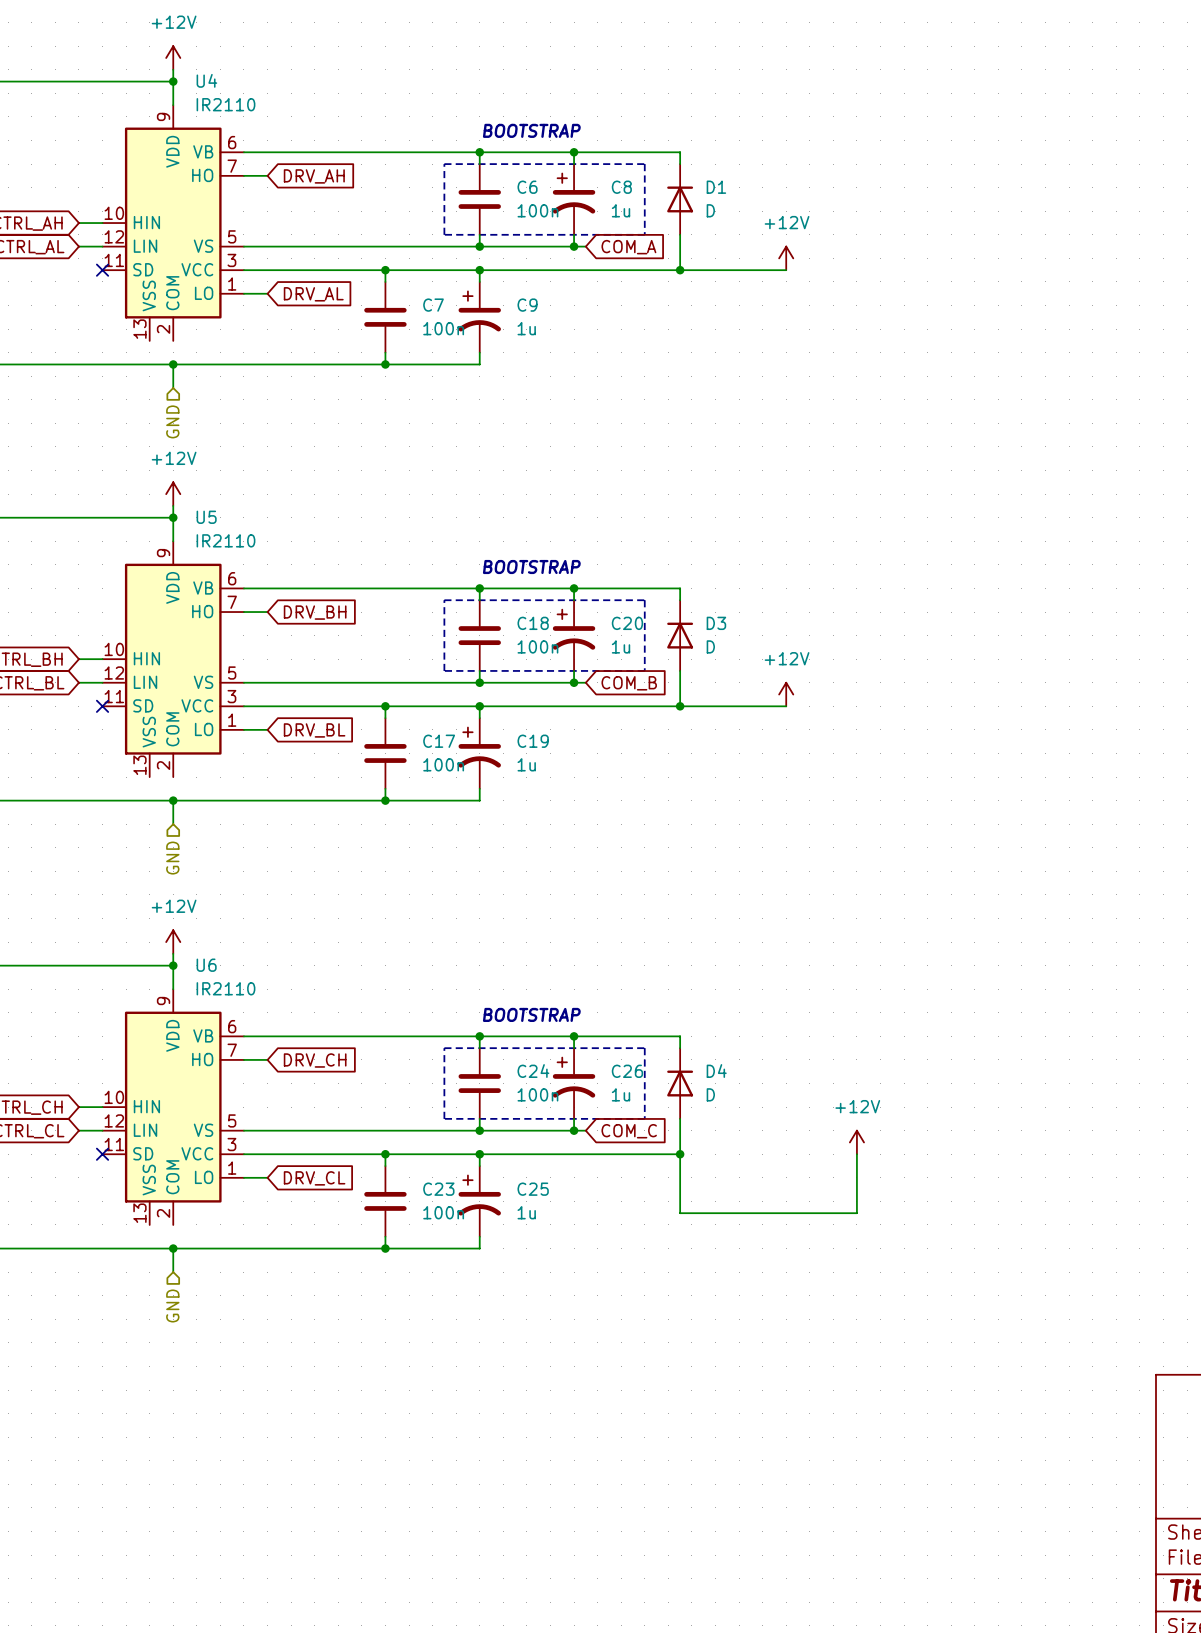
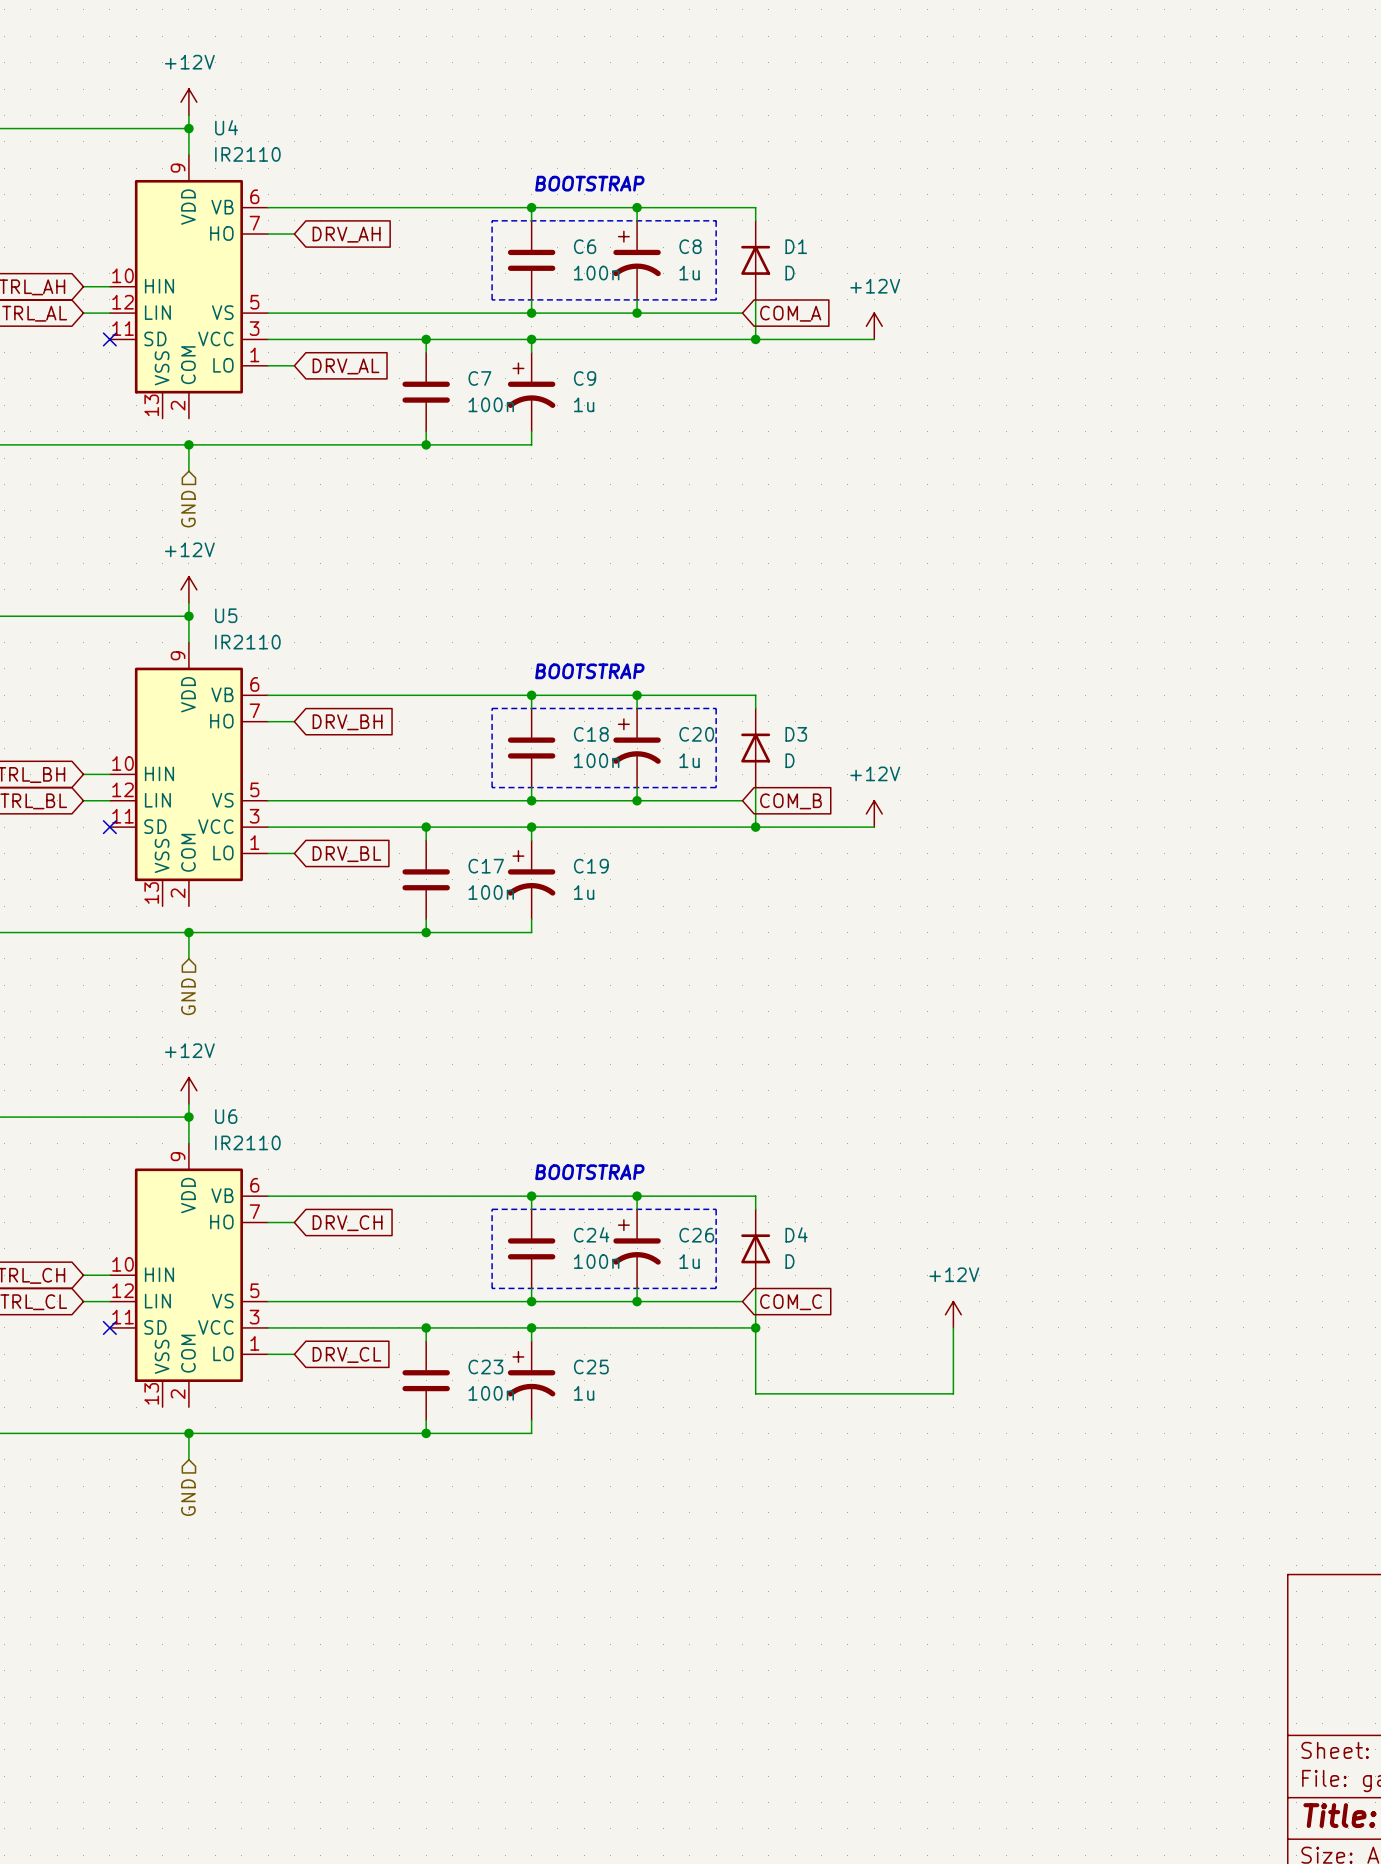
wire: none -> (650, 313) (742, 313)
global label position: COM_A (628, 247) -> COM_A (790, 313)
wire: none -> (650, 800) (742, 800)
global label position: COM_B (629, 683) -> COM_B (791, 801)
wire: none -> (650, 1301) (742, 1301)
global label position: COM_C (629, 1131) -> COM_C (791, 1302)

